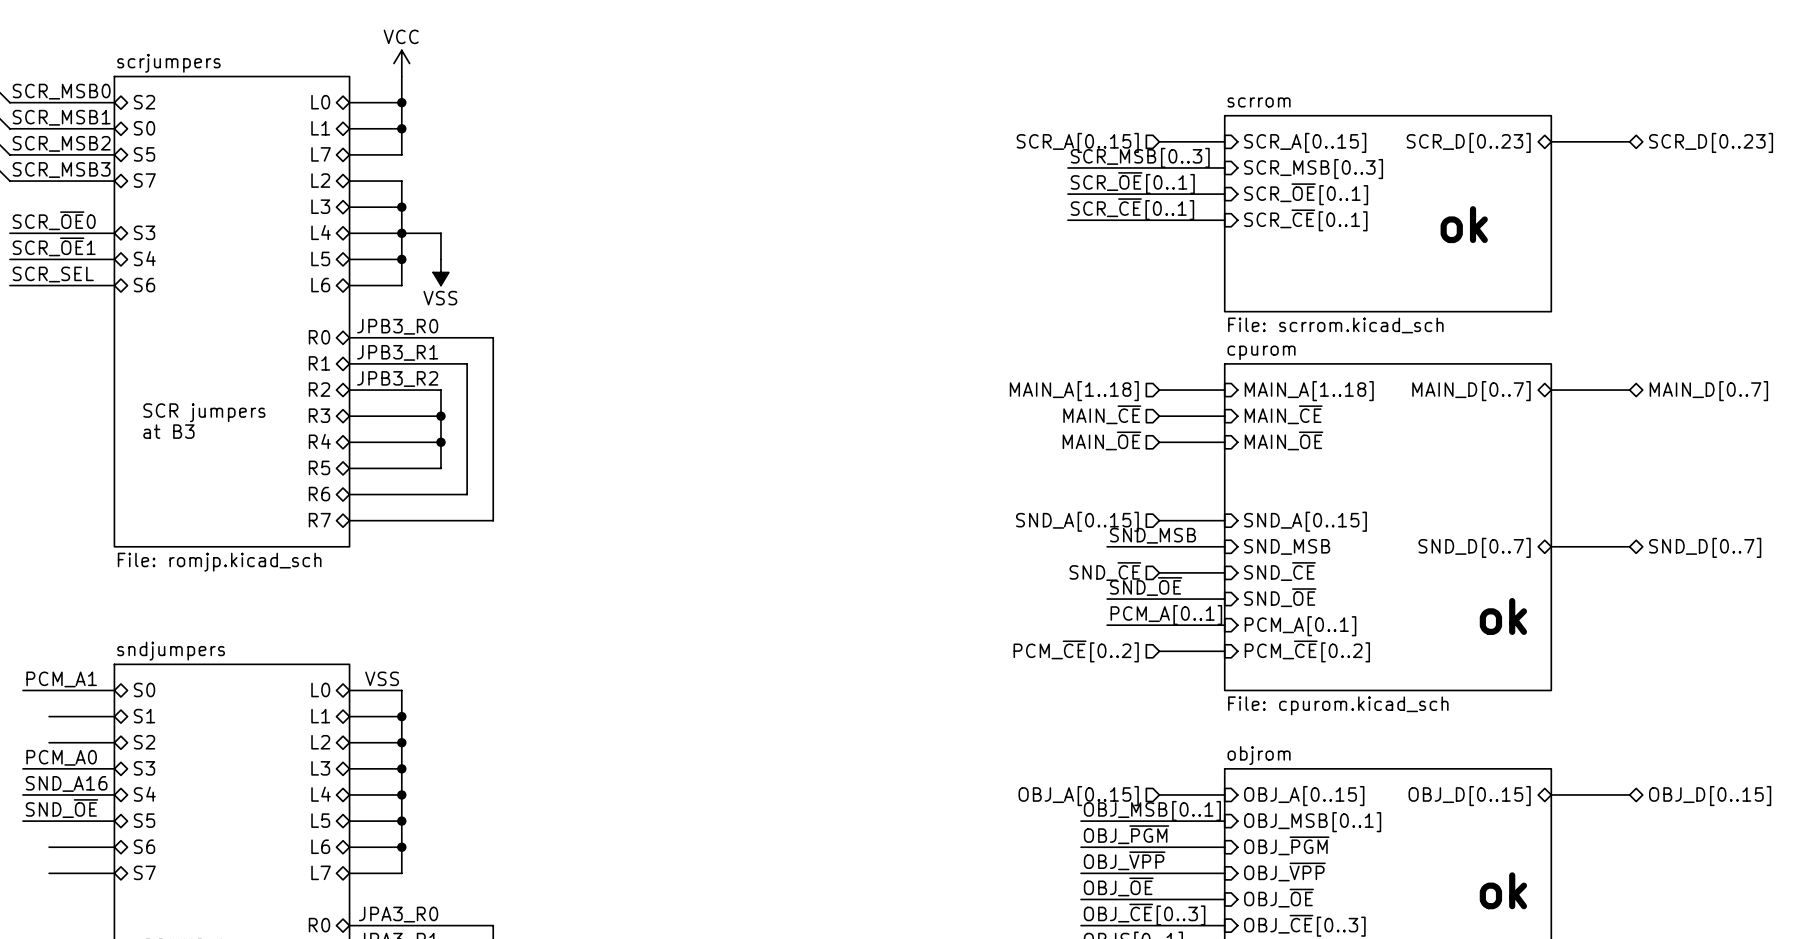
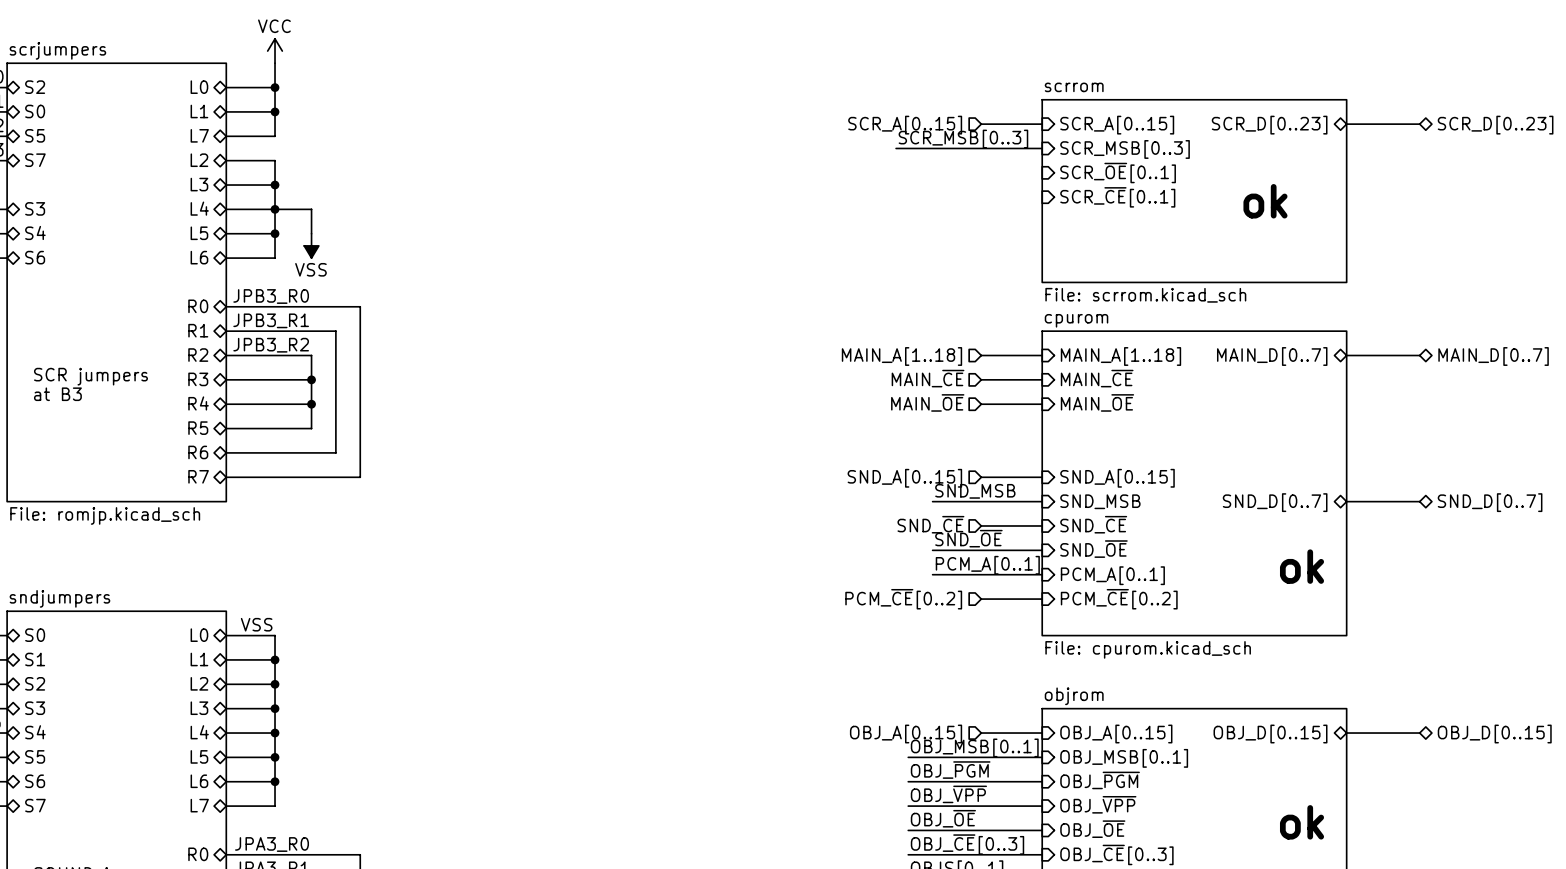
label: SCR_~{OE}[0..1] (1132, 183) -> none
bus: (1067, 194) (1224, 194) -> none
label: SCR_~{CE}[0..1] (1132, 209) -> none
bus: (1067, 220) (1224, 220) -> none

